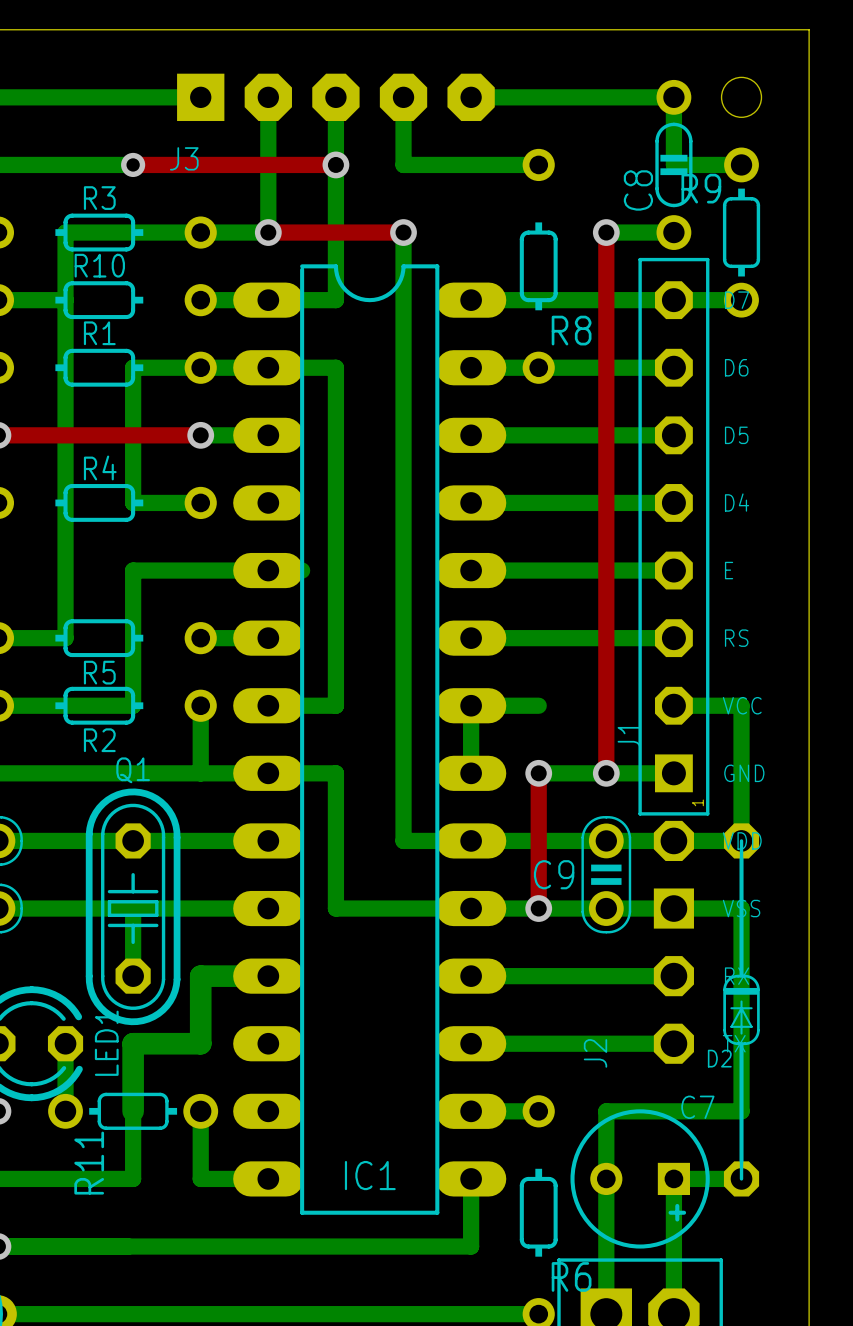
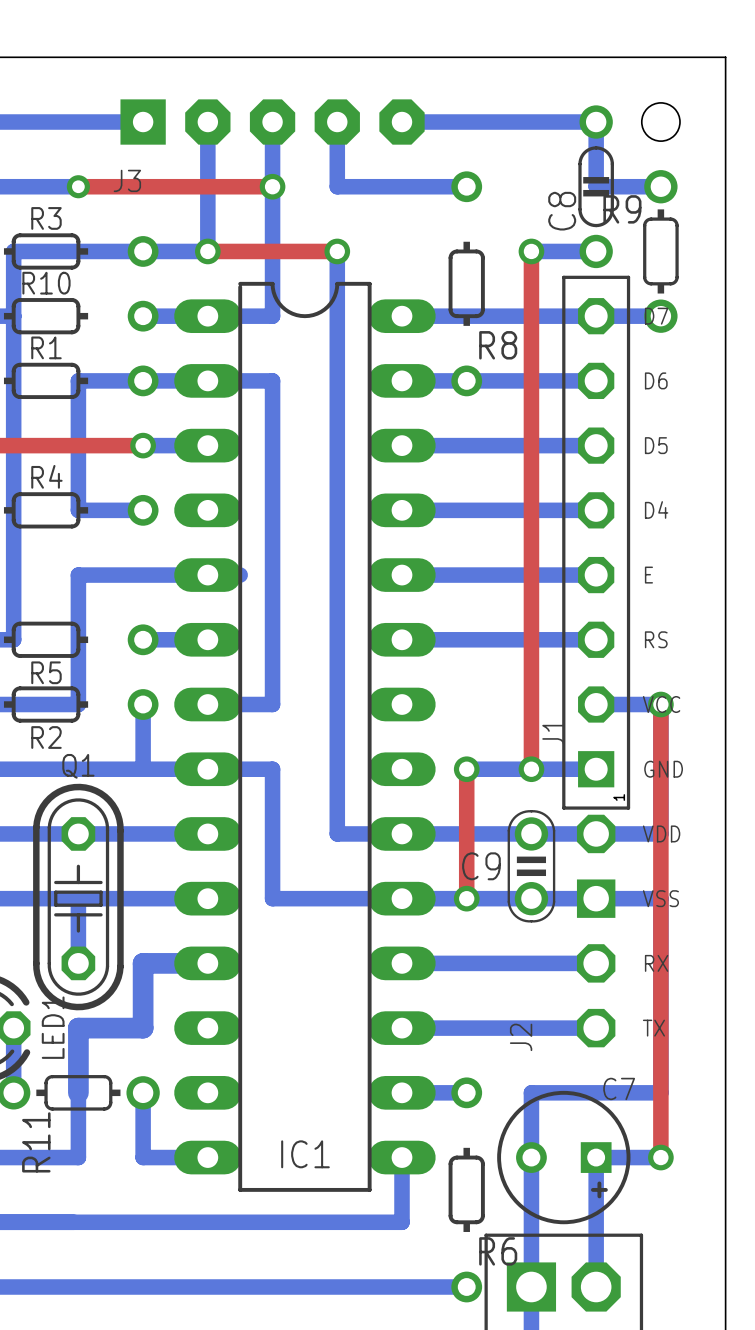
bottom track: (538, 705) (471, 705) (471, 773) -> none
top track: none -> (660, 704) (660, 1157)
via: none -> (660, 704)
D2: (741, 1009) -> none
via: none -> (660, 1157)

